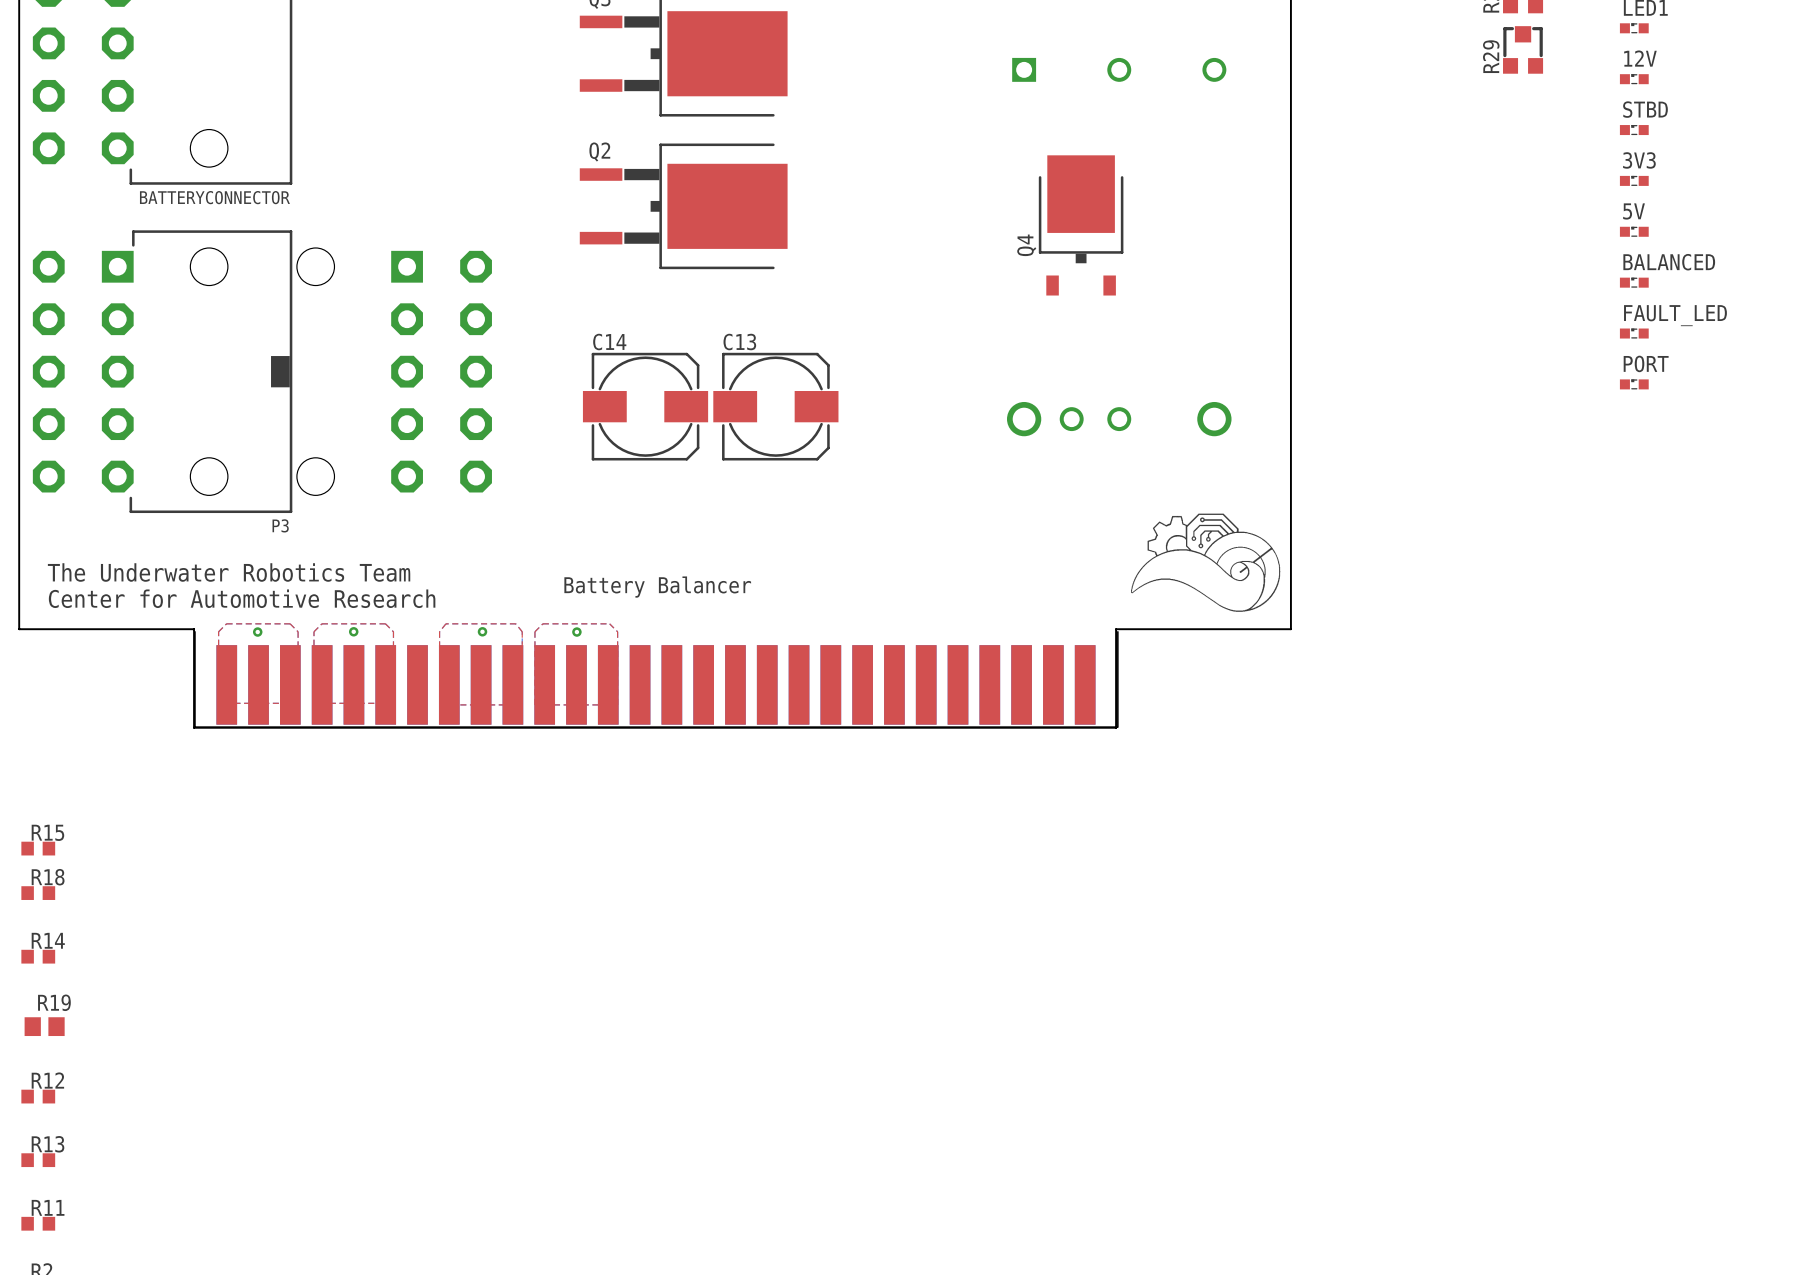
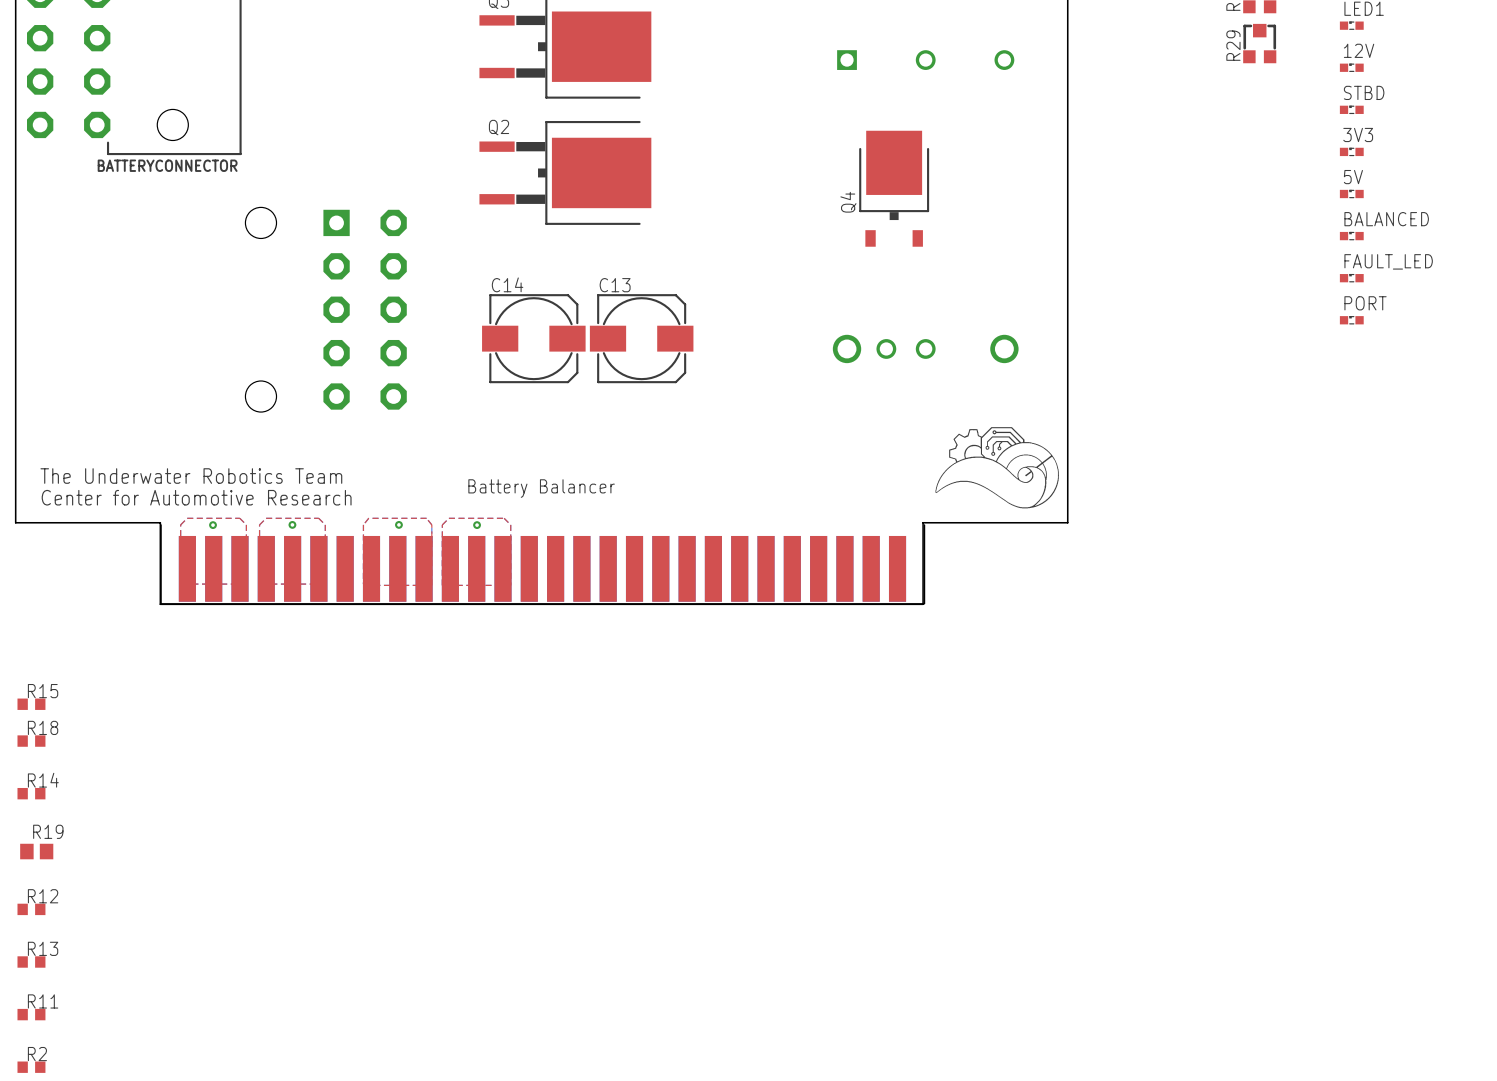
P3: (162, 371) -> none

